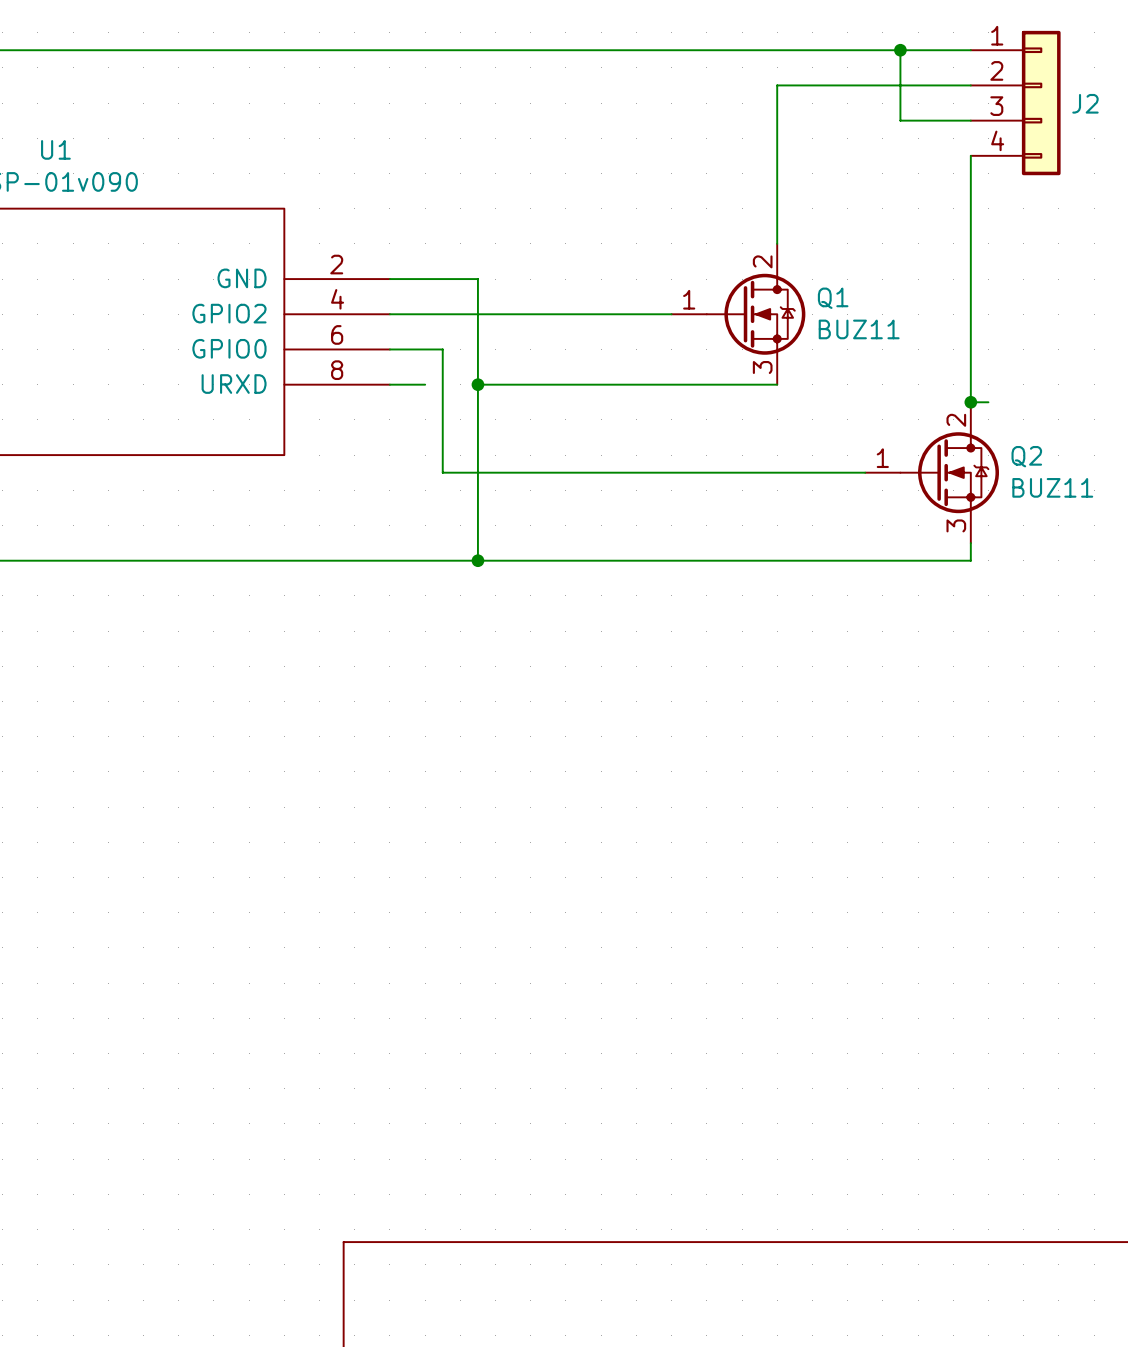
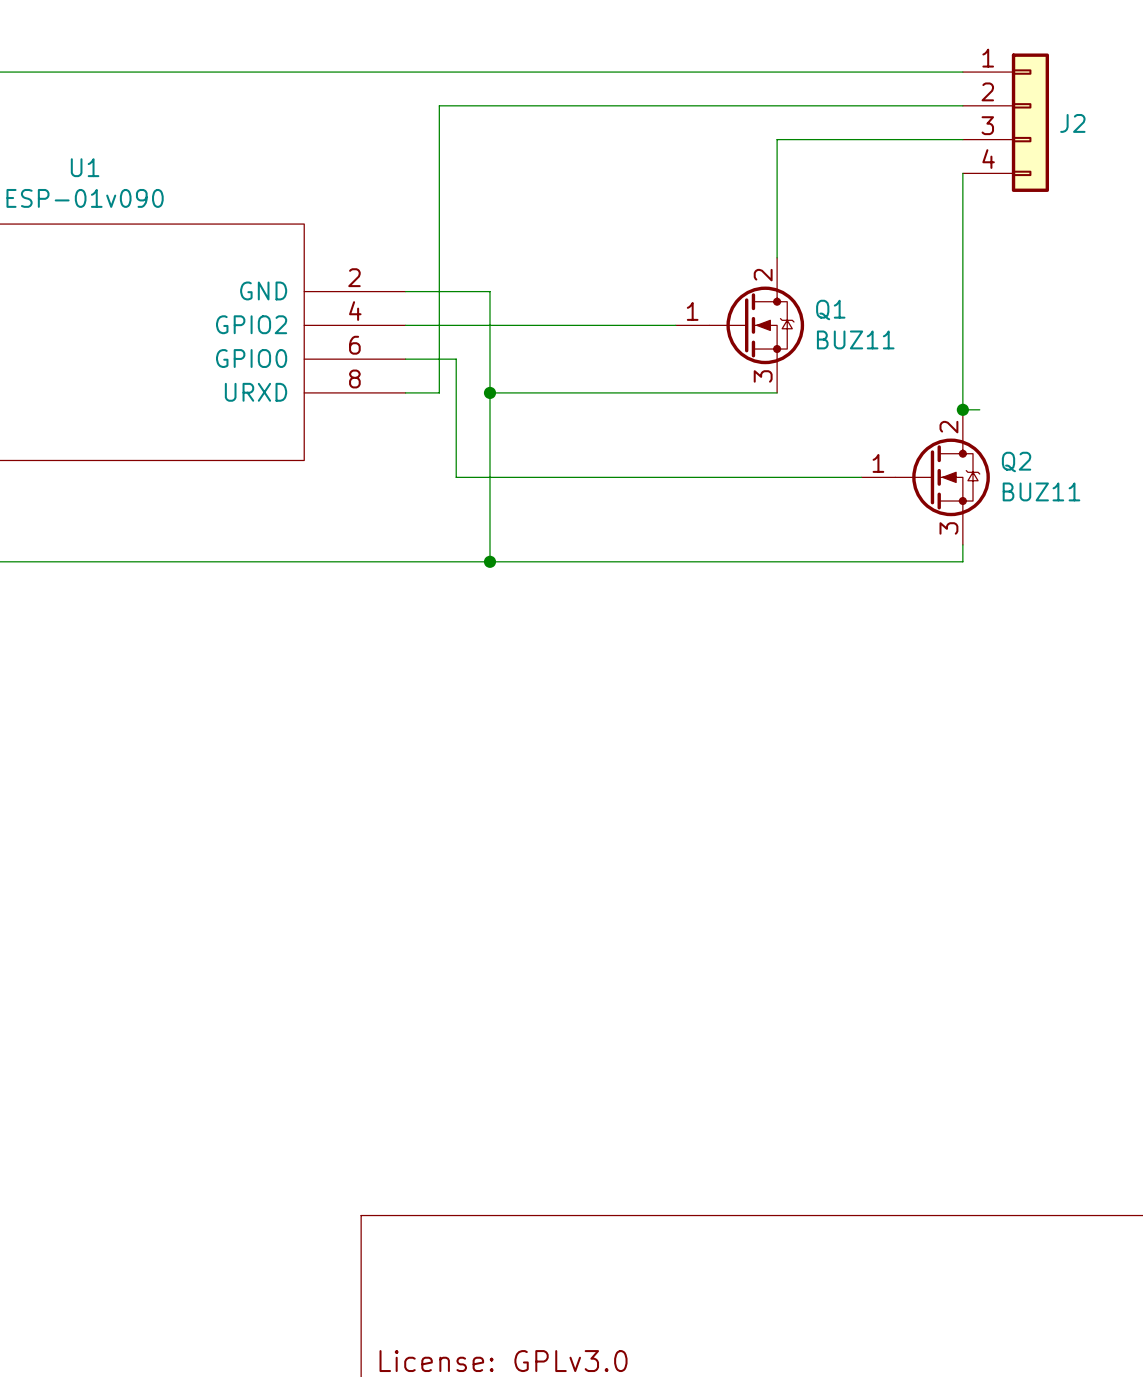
wire: (900, 50) (900, 120) -> none
junction: (900, 50) -> none
wire: (777, 85) (777, 120) -> (895, 139) (777, 139)
wire: none -> (777, 105) (439, 105) (439, 392)

